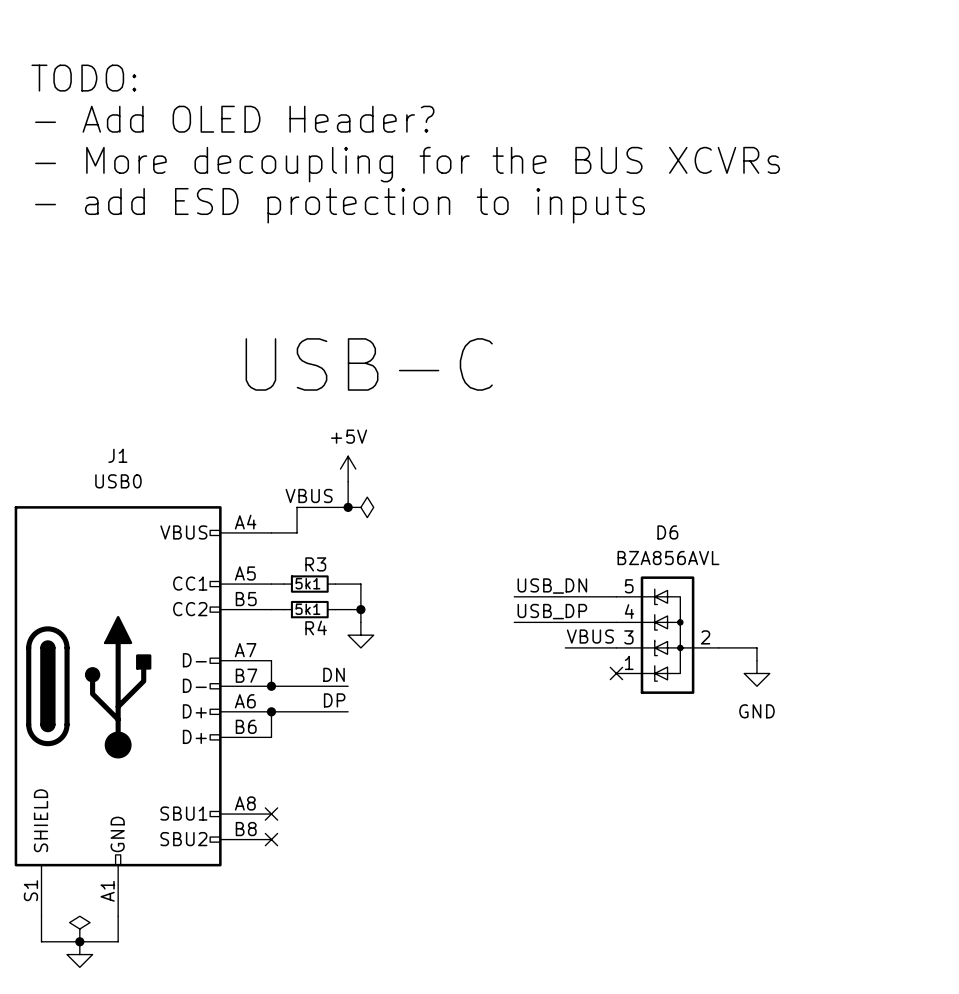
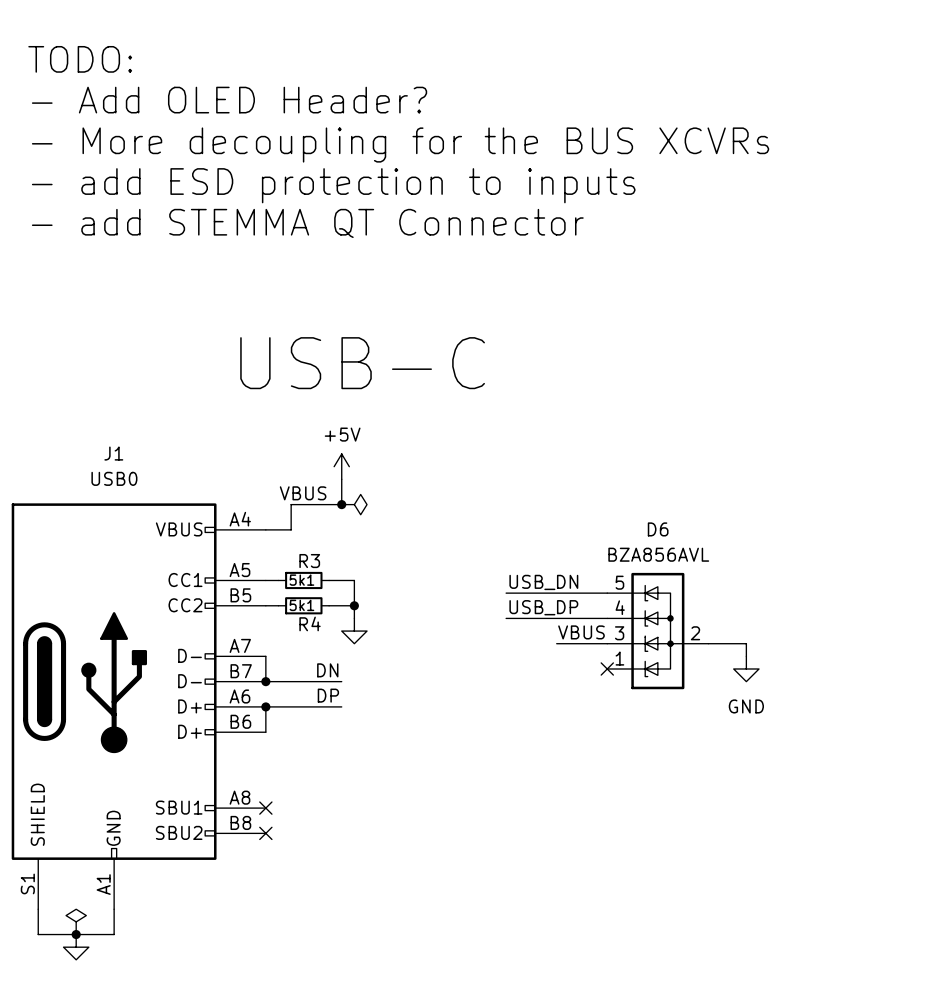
text position: TODO: (83, 78) -> TODO: (80, 59)
text position: - Add OLED Header? (234, 119) -> - Add OLED Header? (229, 100)
text position: - More decoupling for the BUS XCVRs (407, 164) -> - More decoupling for the BUS XCVRs (400, 145)
text position: - add ESD protection to inputs (340, 205) -> - add ESD protection to inputs (333, 185)
text: none -> - add STEMMA QT Connector (307, 223)

